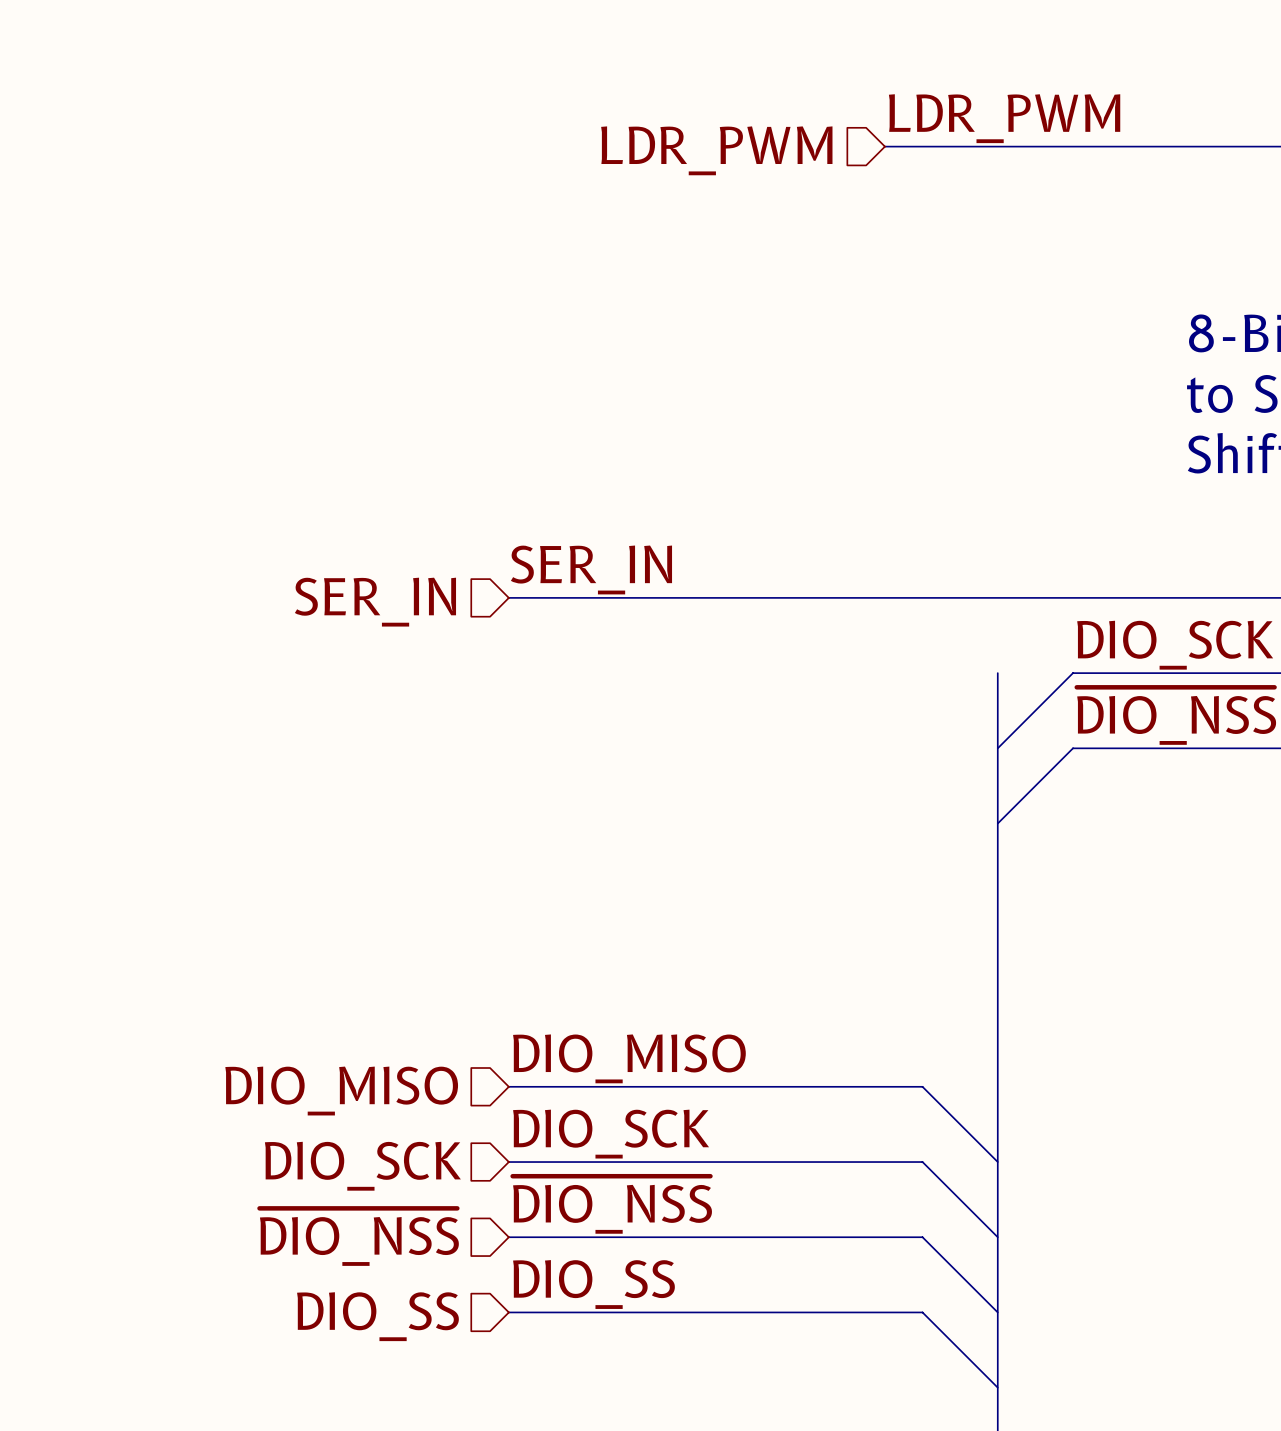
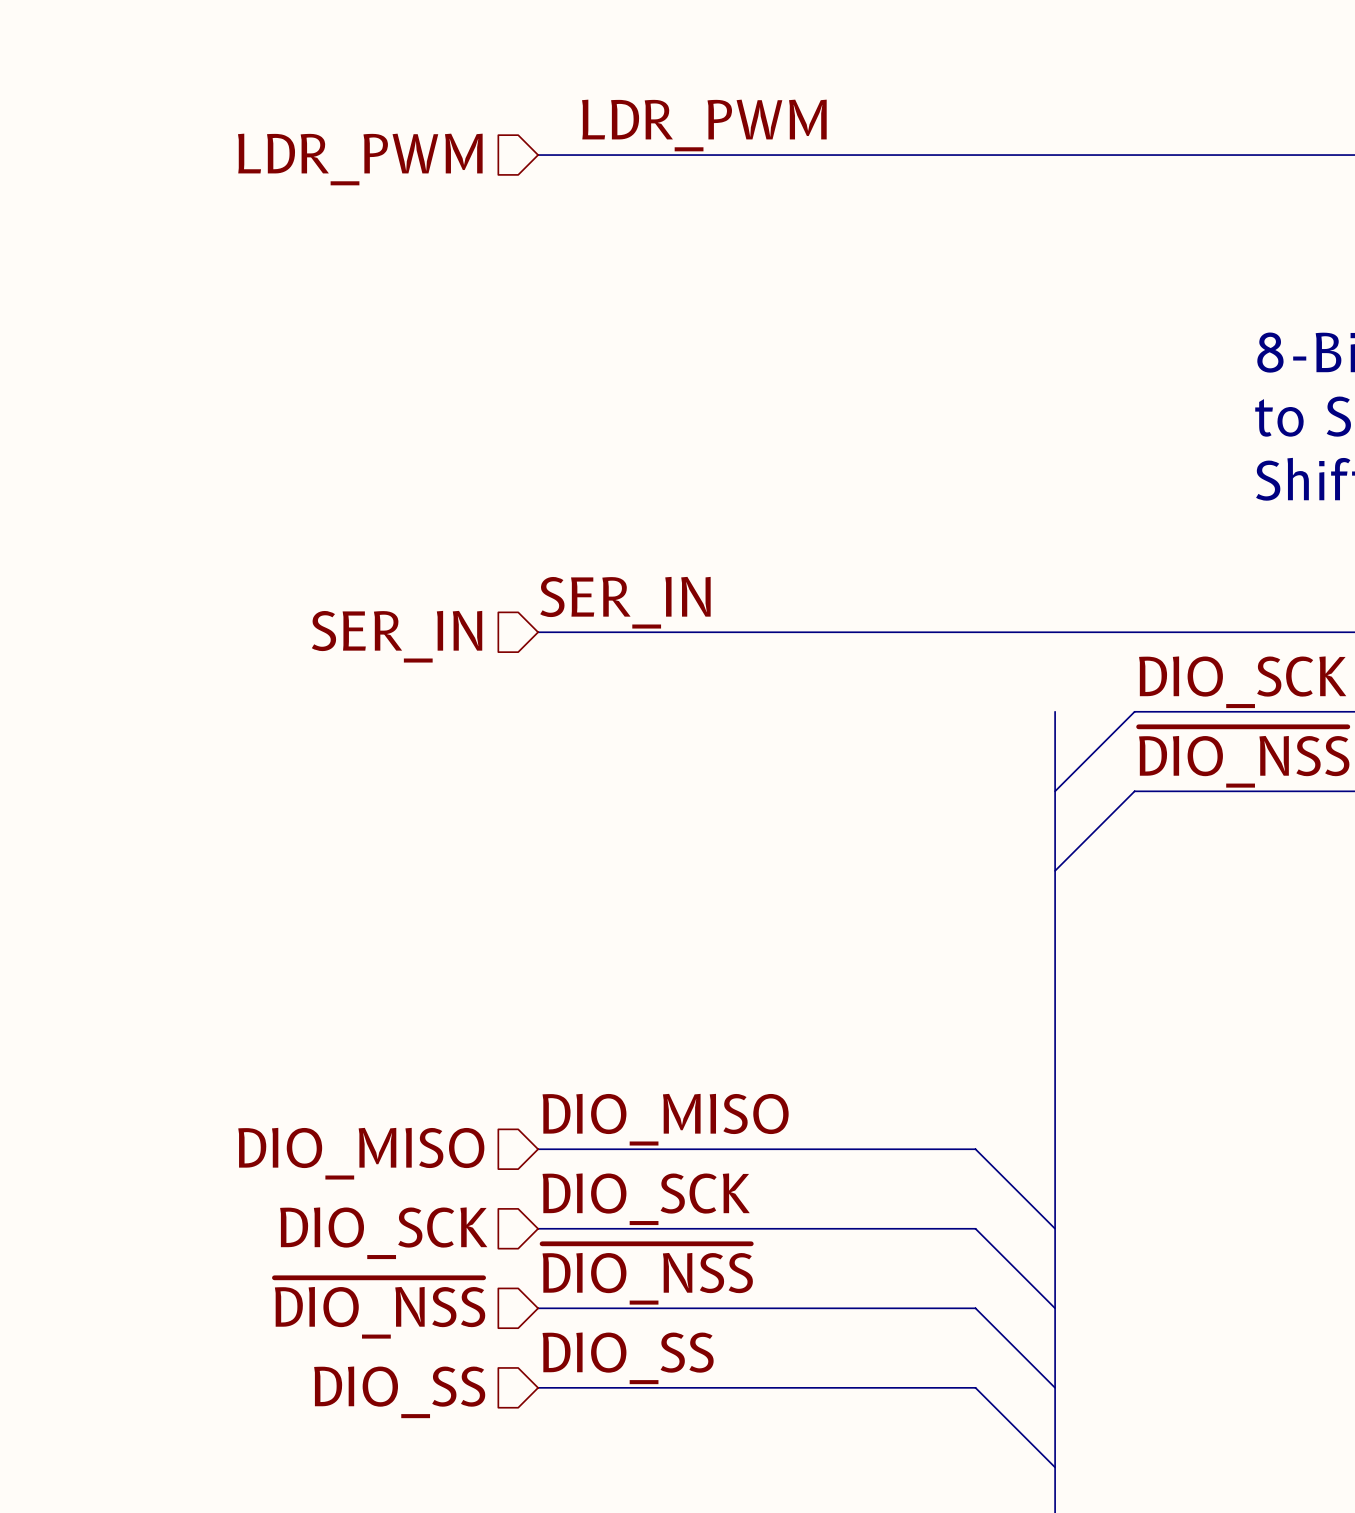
label position: LDR_PWM (1004, 118) -> LDR_PWM (704, 125)
wire: none -> (538, 155) (935, 155)
hierarchical label position: LDR_PWM (716, 150) -> LDR_PWM (360, 159)

